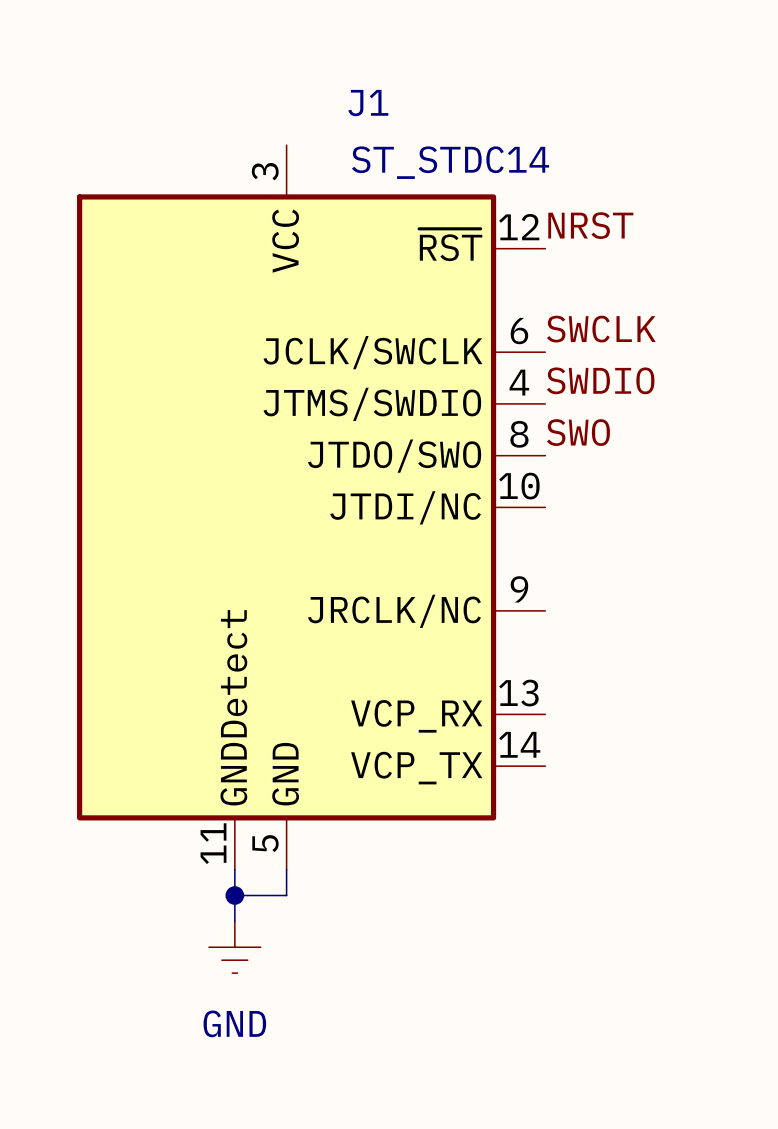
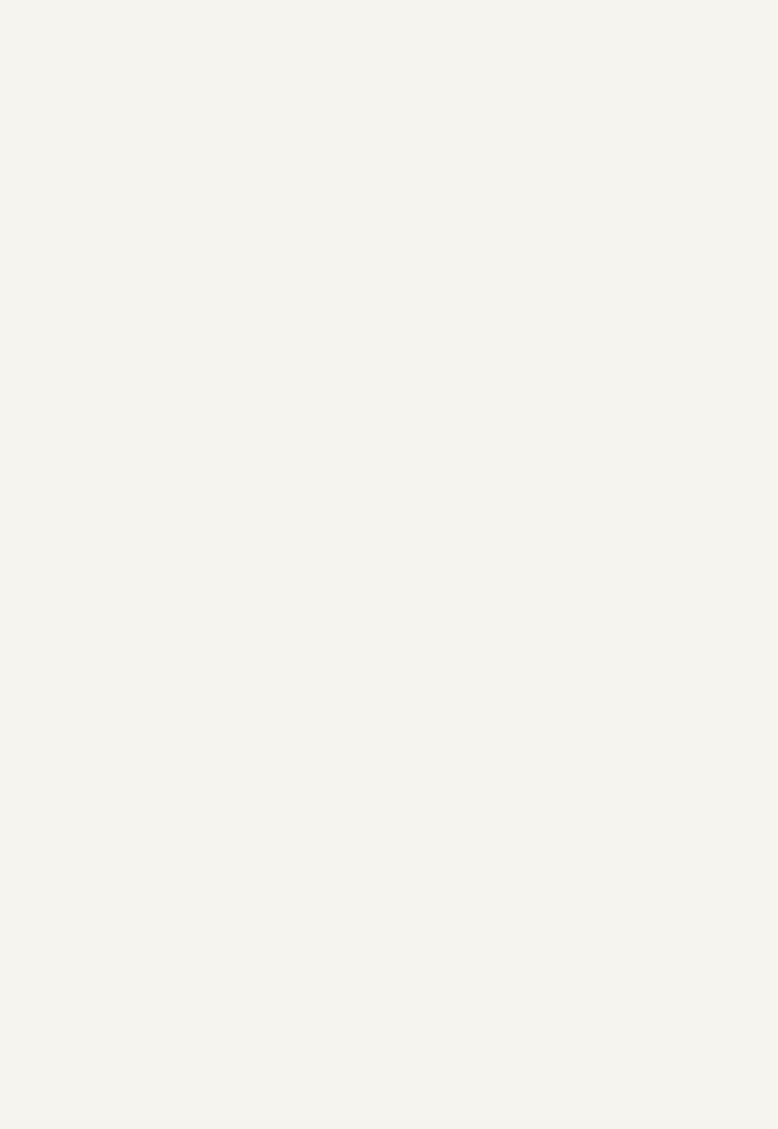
label: NRST (590, 225) -> none
label: SWCLK (601, 329) -> none
label: SWDIO (600, 380) -> none
label: SWO (578, 432) -> none
J1: ST_STDC14 (311, 507) -> none
wire: (234, 869) (234, 921) -> none
wire: (286, 869) (286, 895) (234, 895) -> none
junction: (234, 895) -> none
power symbol: GND (234, 947) -> none

